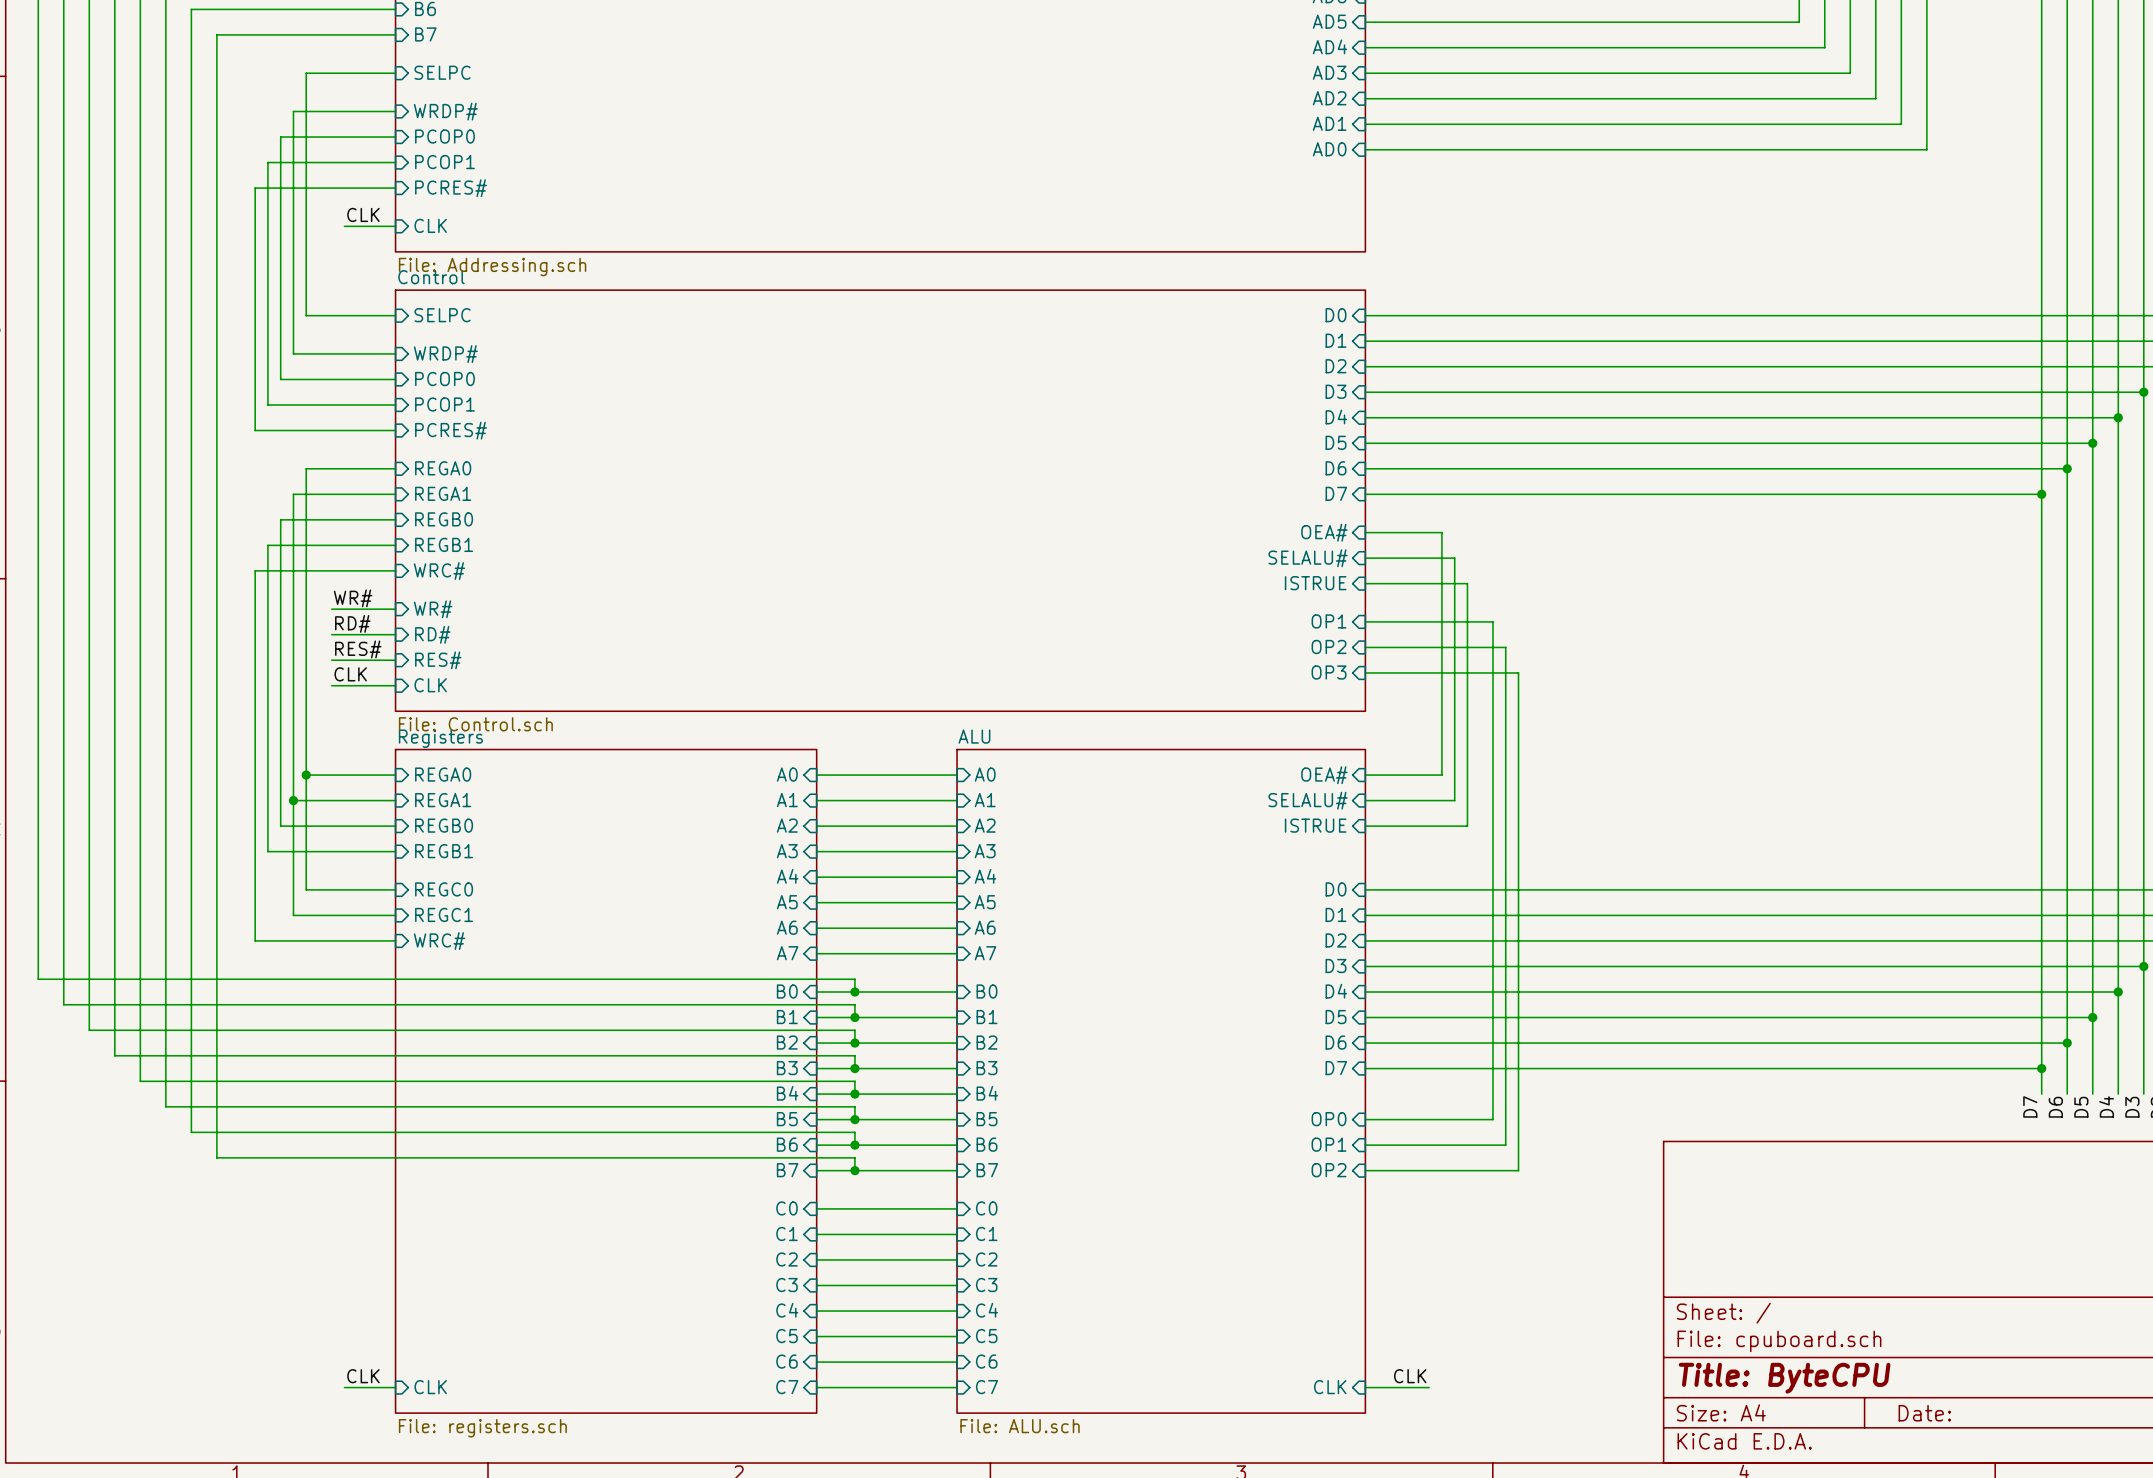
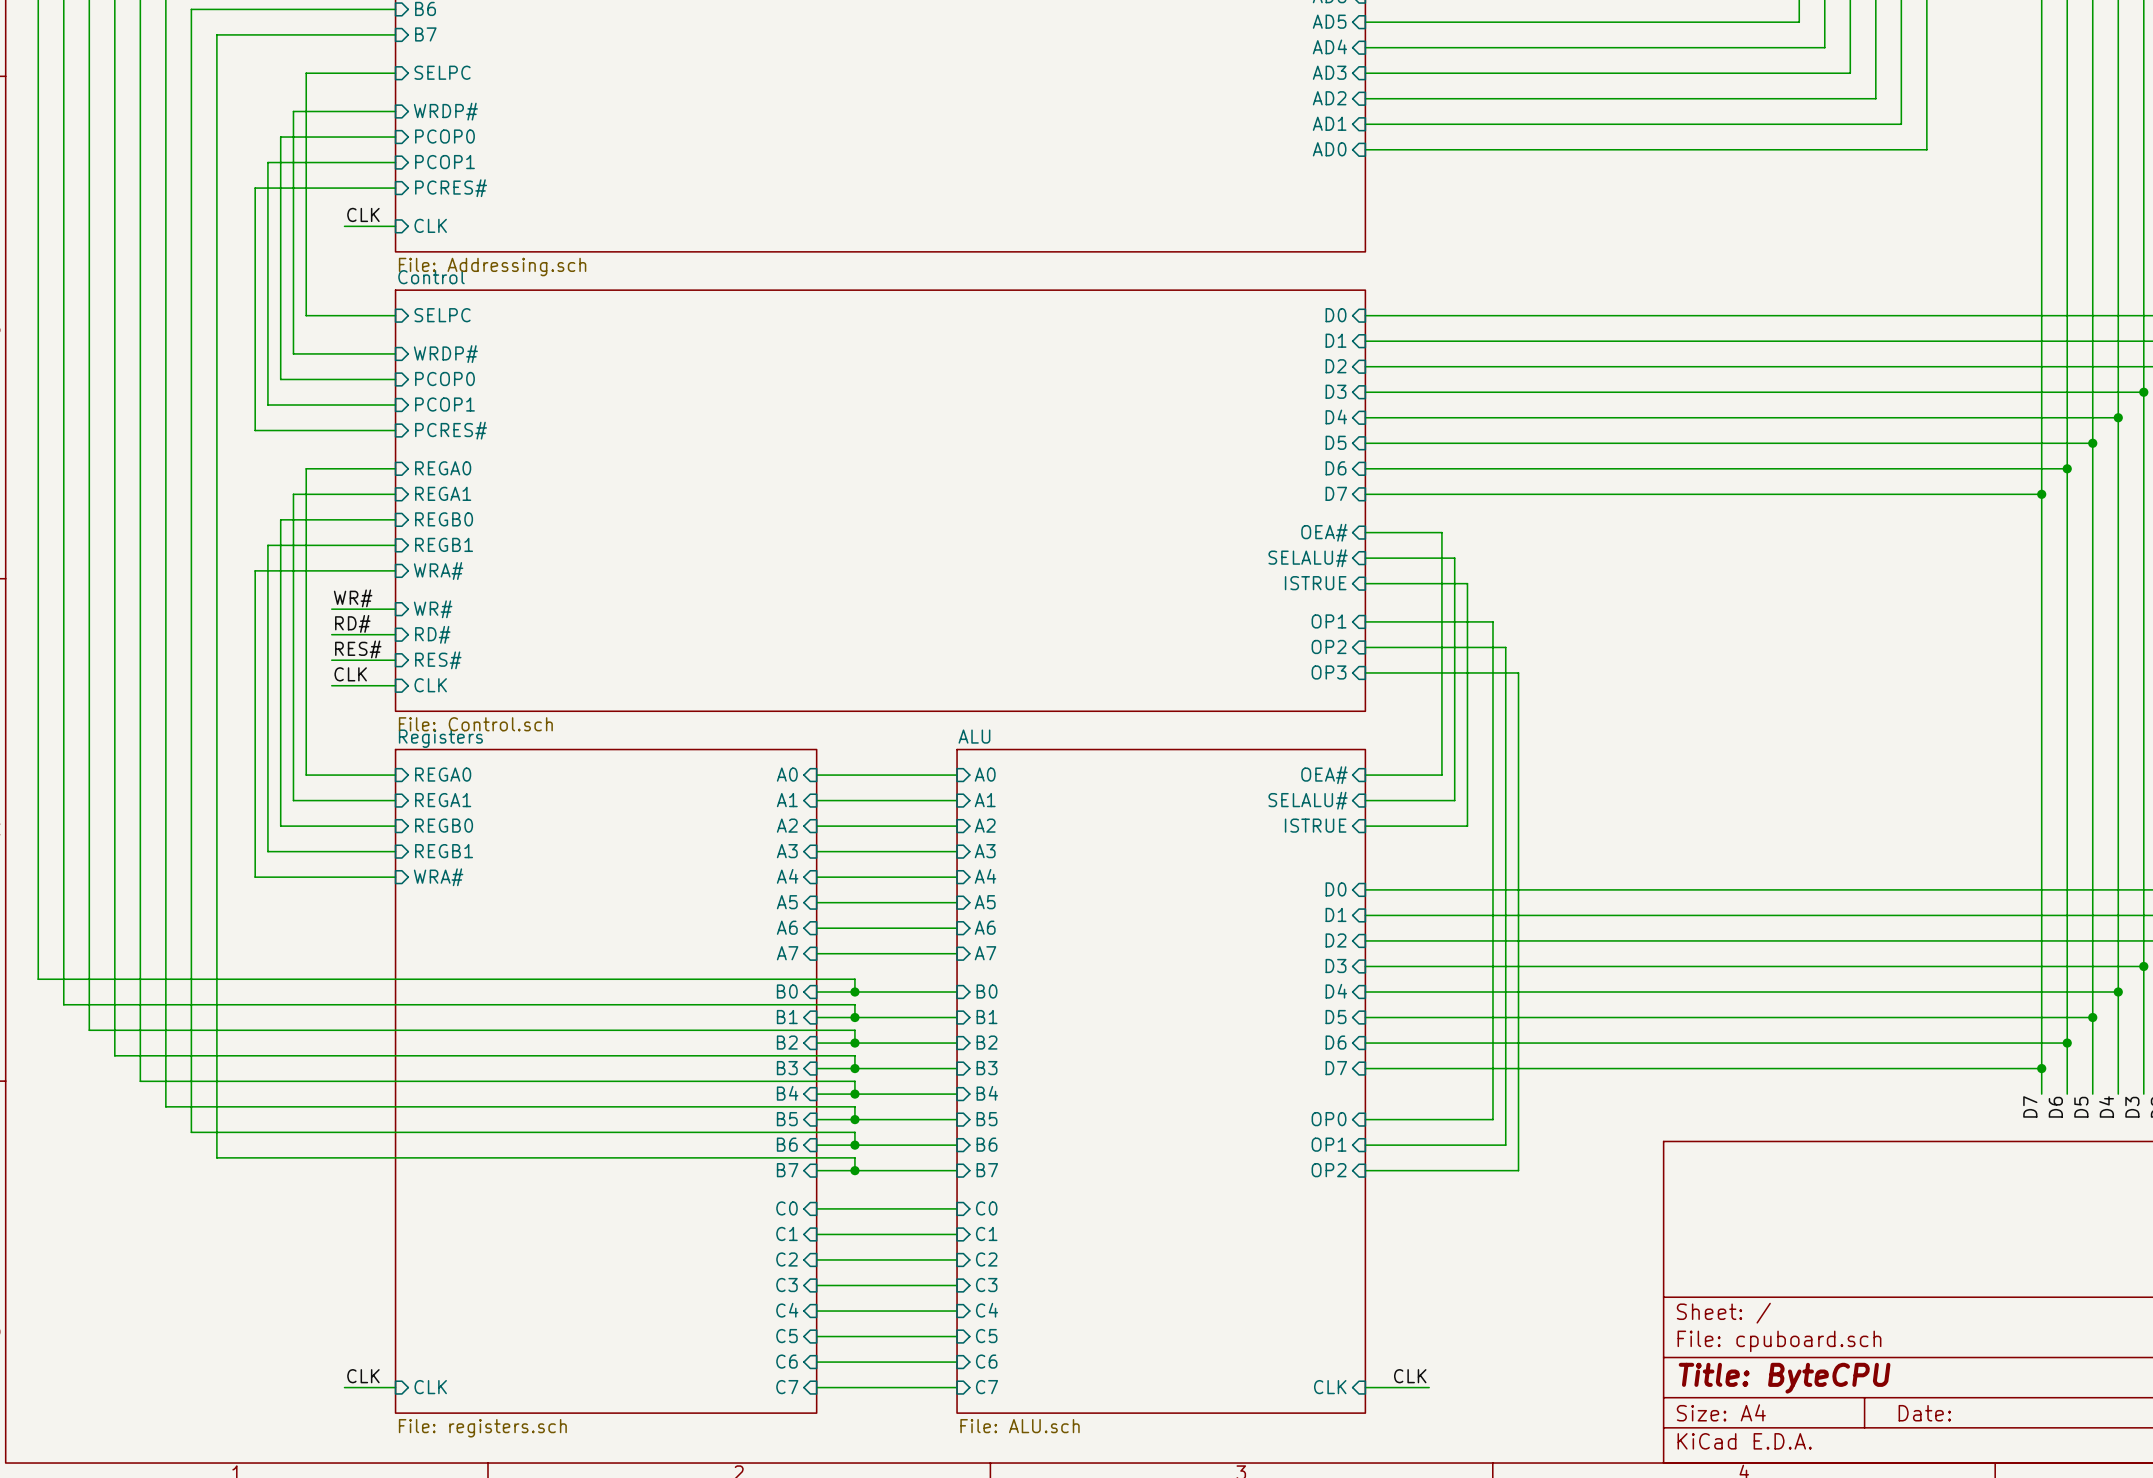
sheet pin: WRC# (439, 571) -> WRA# (438, 571)
wire: (306, 775) (306, 889) (395, 889) -> none
junction: (306, 775) -> none
wire: (293, 800) (293, 915) (395, 915) -> none
junction: (293, 800) -> none
wire: (255, 877) (255, 940) (395, 940) -> (255, 877) (395, 877)
sheet pin: none -> WRA# (438, 877)
sheet pin: REGC0 (444, 889) -> none
sheet pin: REGC1 (444, 914) -> none
sheet pin: WRC# (439, 941) -> none

